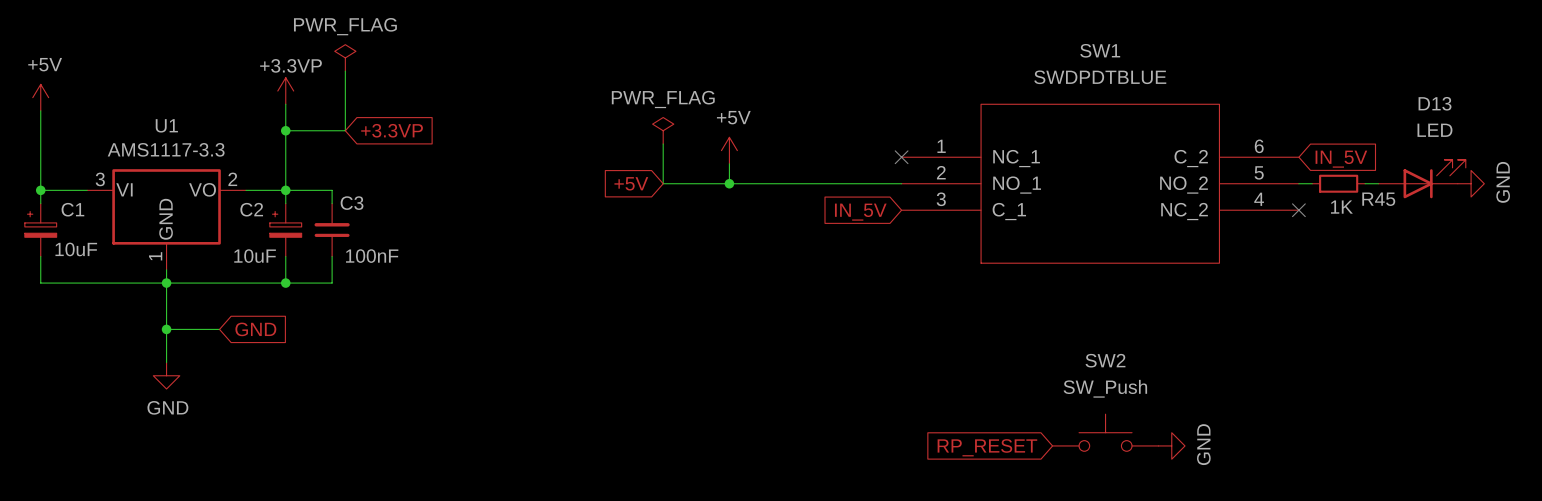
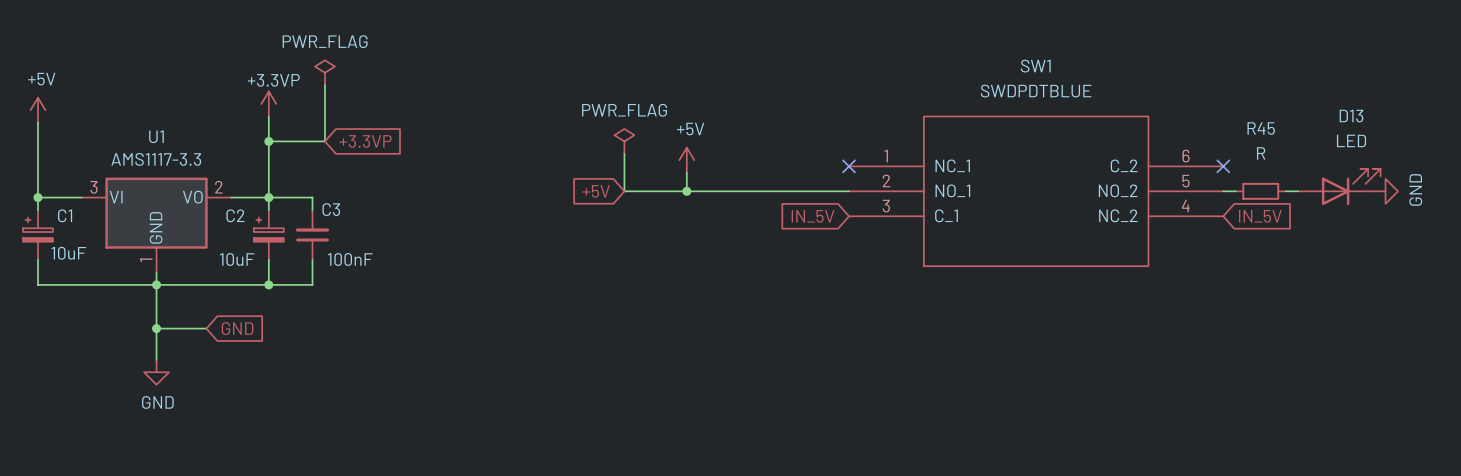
global label position: IN_5V (1341, 159) -> IN_5V (1260, 216)
R45 name position: R45 (1378, 199) -> R45 (1261, 128)
R45 value: 1K (1341, 207) -> R (1261, 153)
no-connect mark position: (1298, 210) -> (1223, 166)
SW2: SW_Push (1105, 432) -> none
power symbol: GND (1171, 445) -> none
global label: RP_RESET (987, 447) -> none

